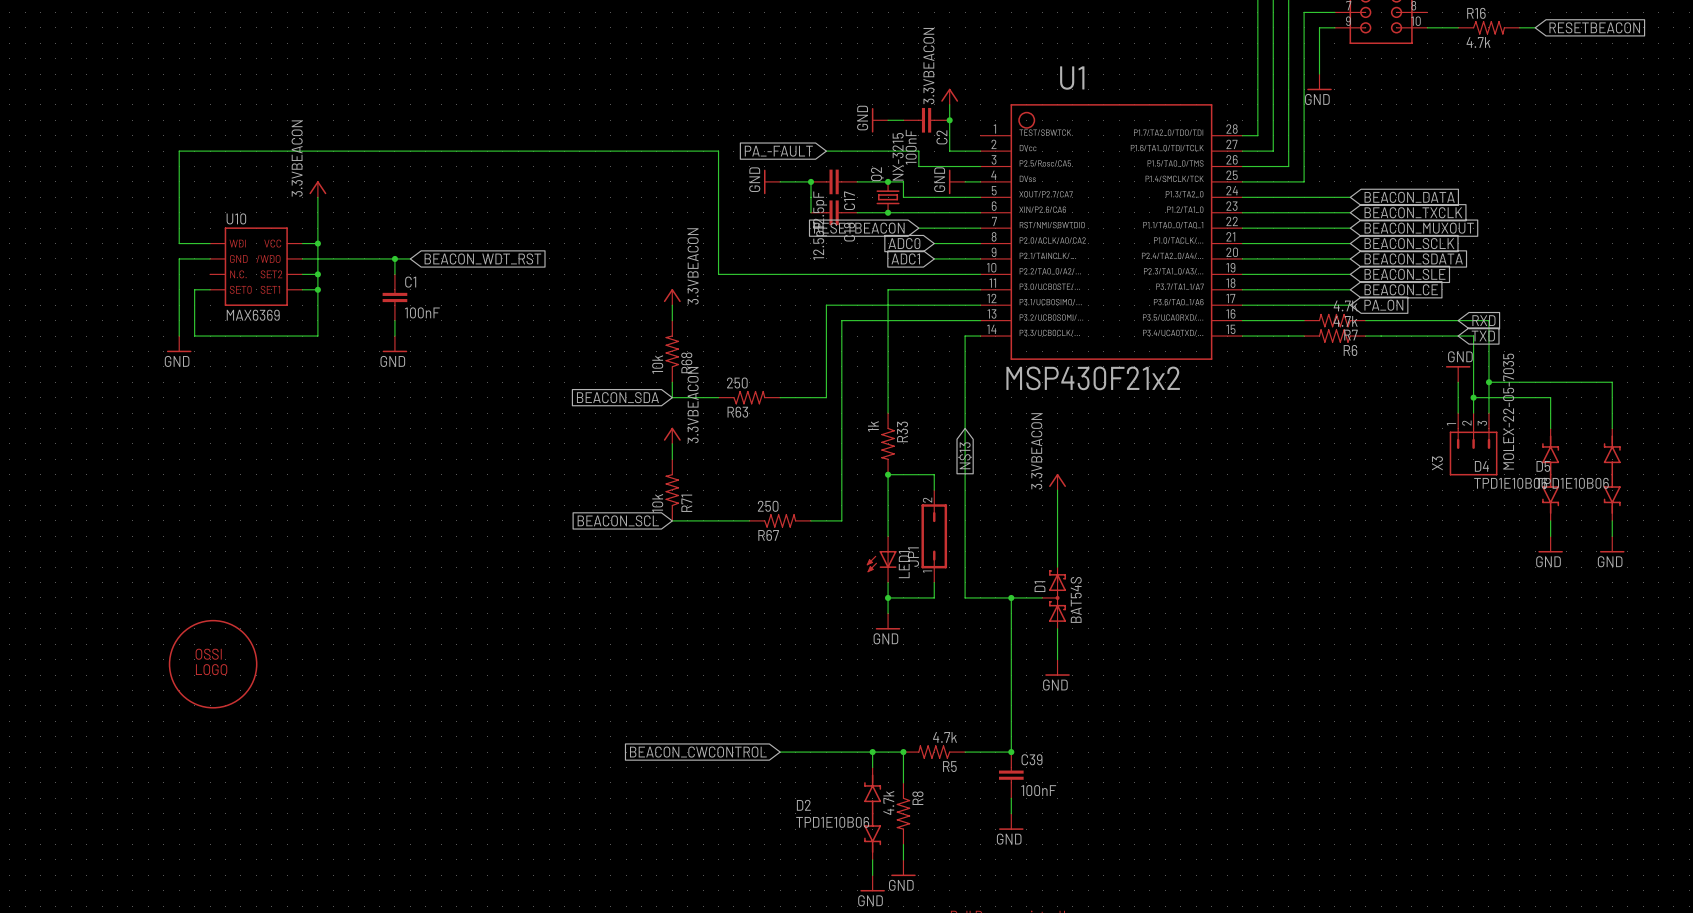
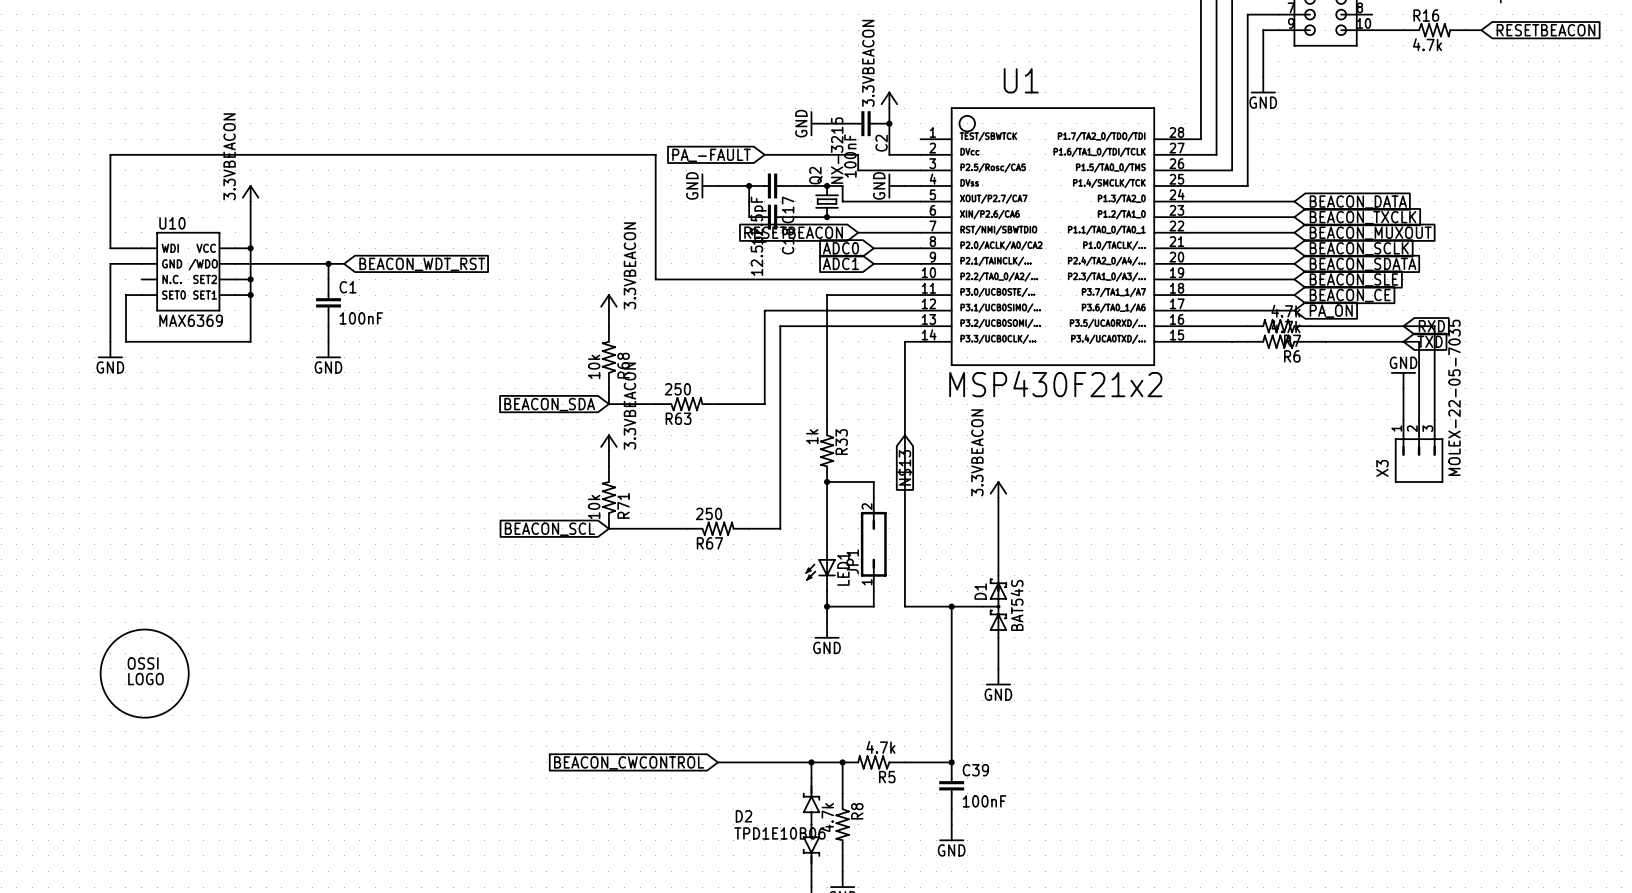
wire: (1488, 382) (1612, 382) (1612, 428) -> none
junction: (1488, 382) -> none
wire: (1473, 397) (1550, 397) (1550, 428) -> none
junction: (1473, 397) -> none
D4: TPD1E10B06 (1550, 474) -> none
D5: TPD1E10B06 (1612, 474) -> none
wire: (1550, 520) (1550, 536) -> none
wire: (1612, 520) (1612, 536) -> none
power symbol: GND (1550, 544) -> none
power symbol: GND (1612, 544) -> none

